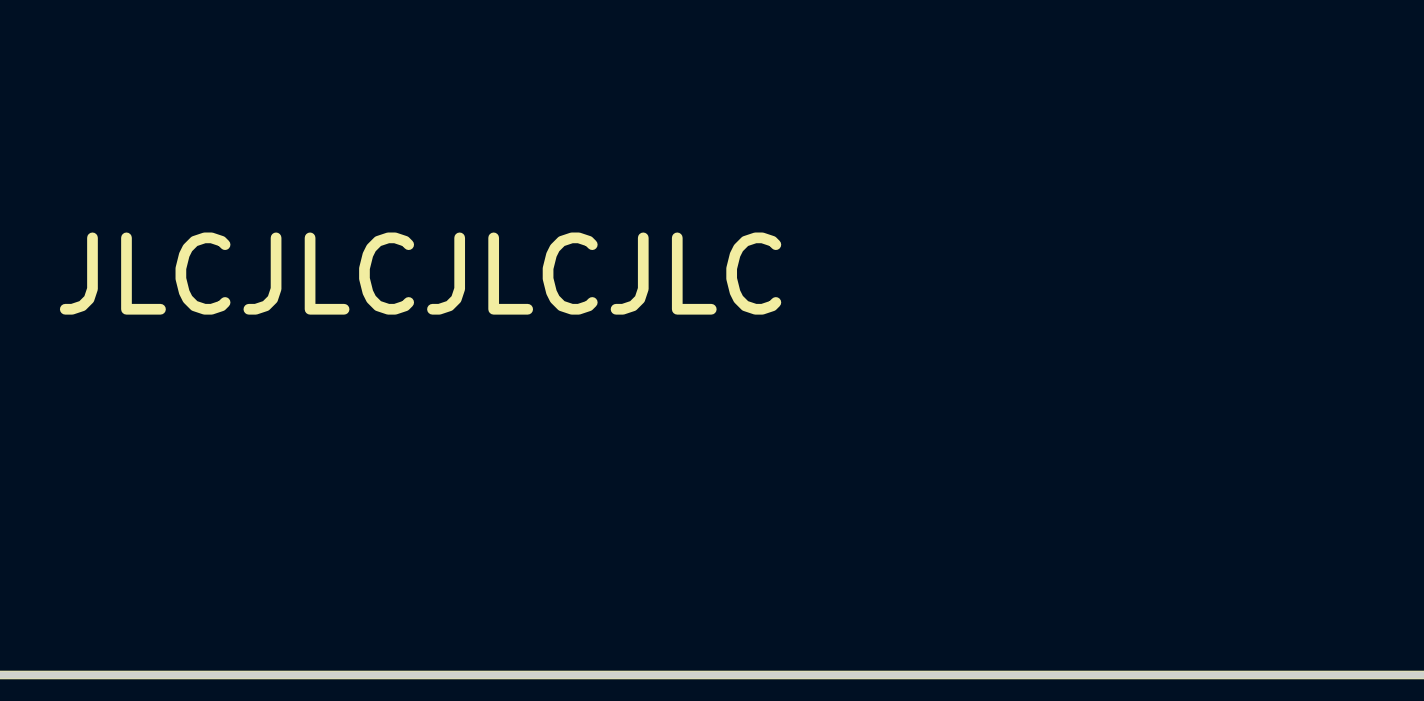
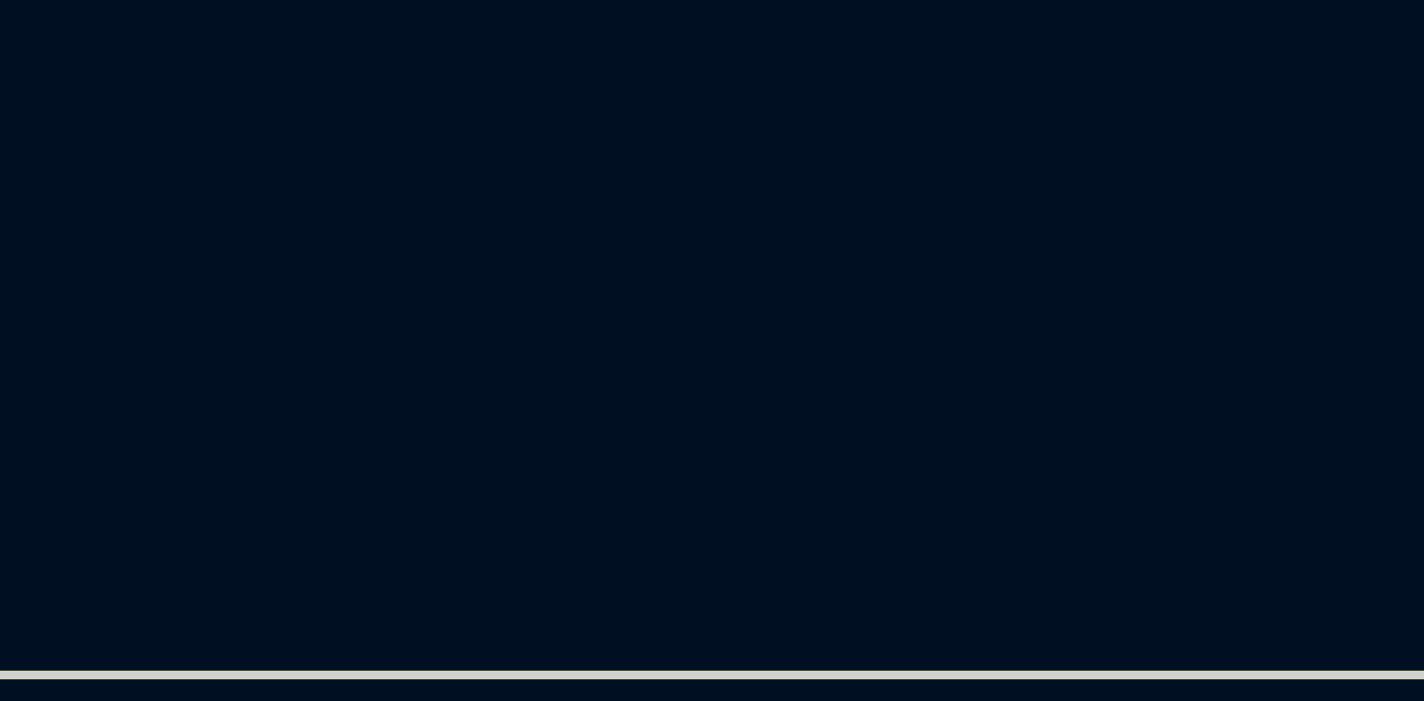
text: JLCJLCJLCJLC (420, 273) -> none

